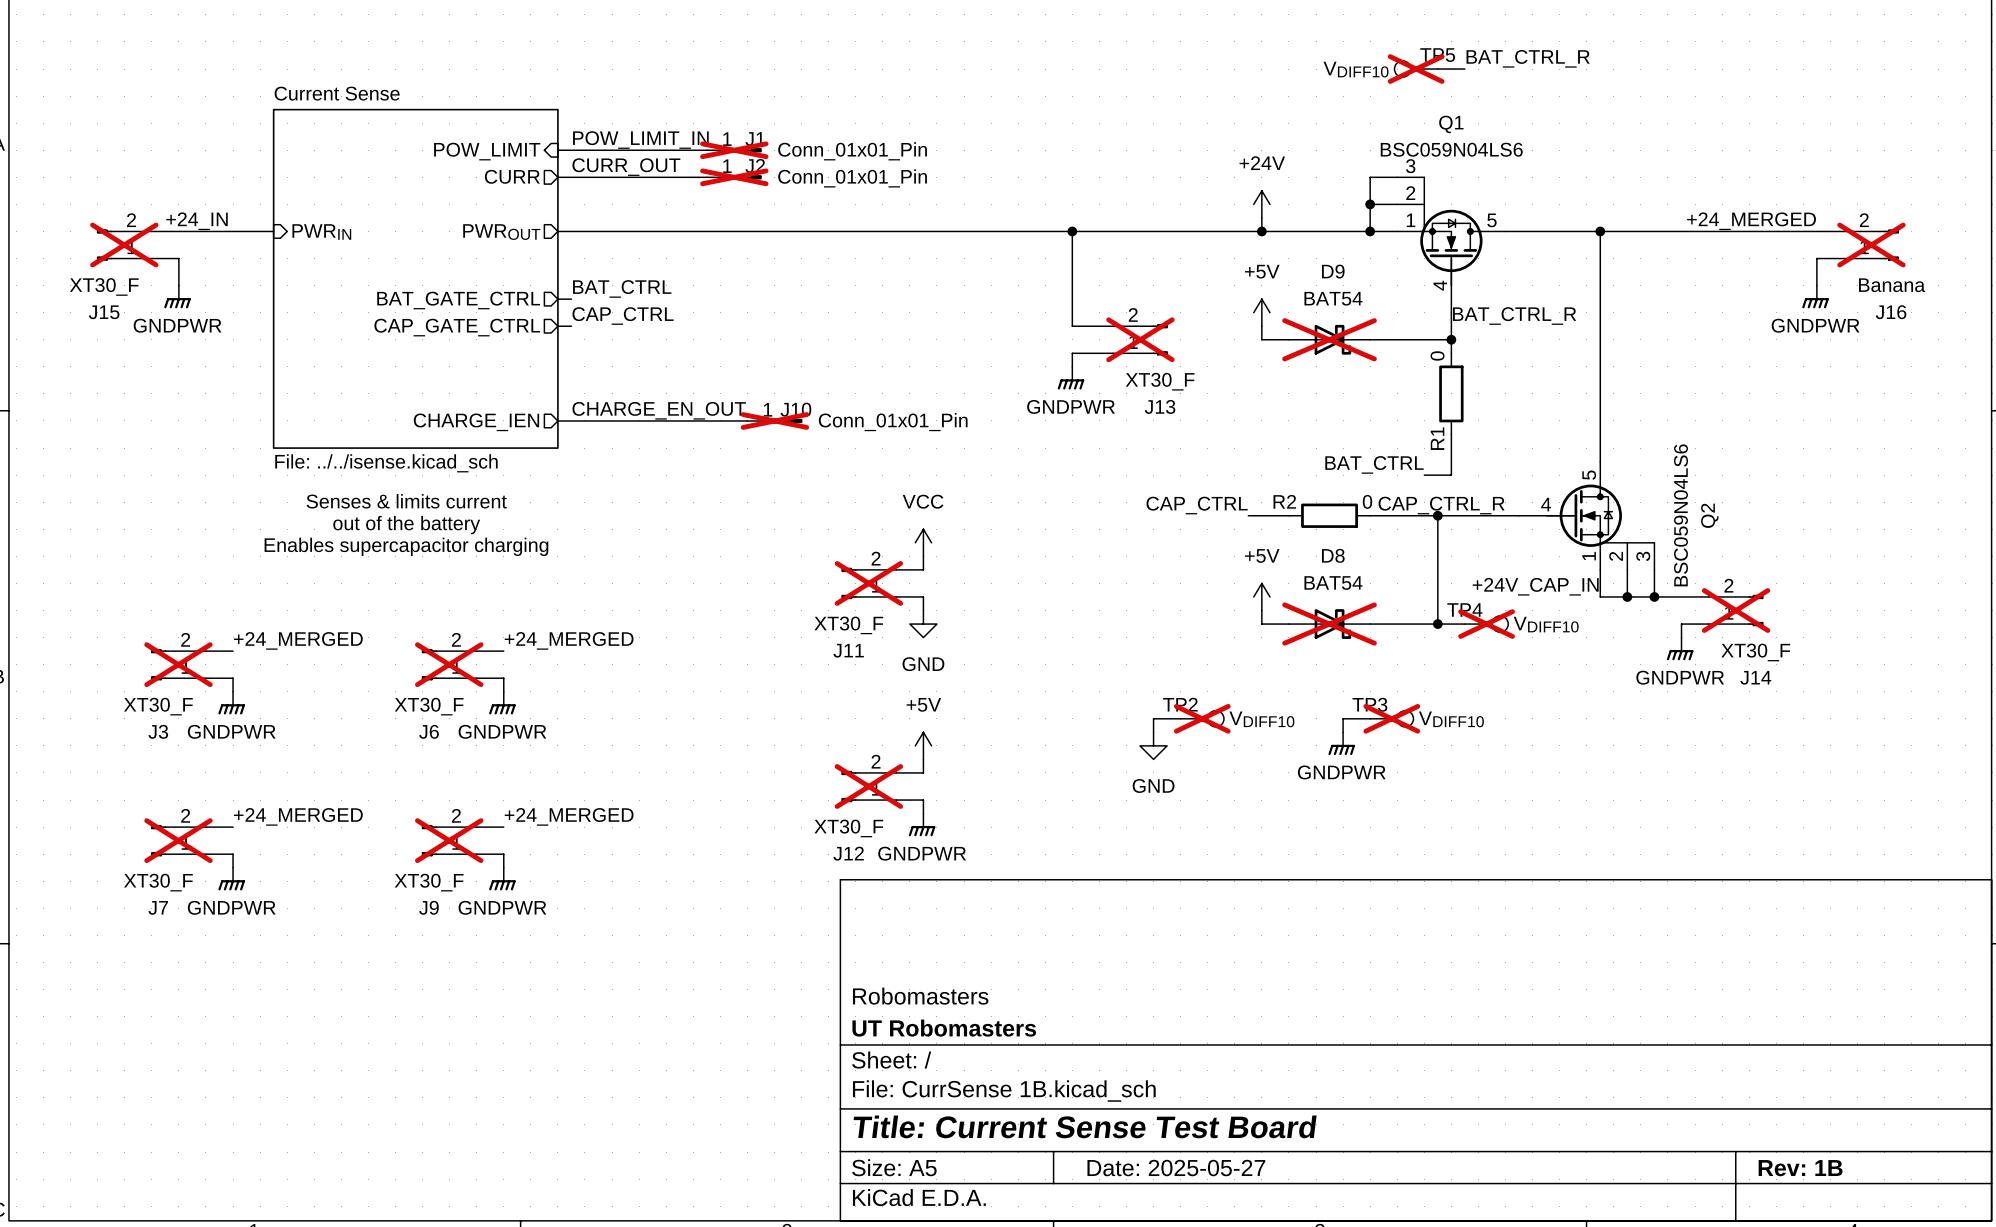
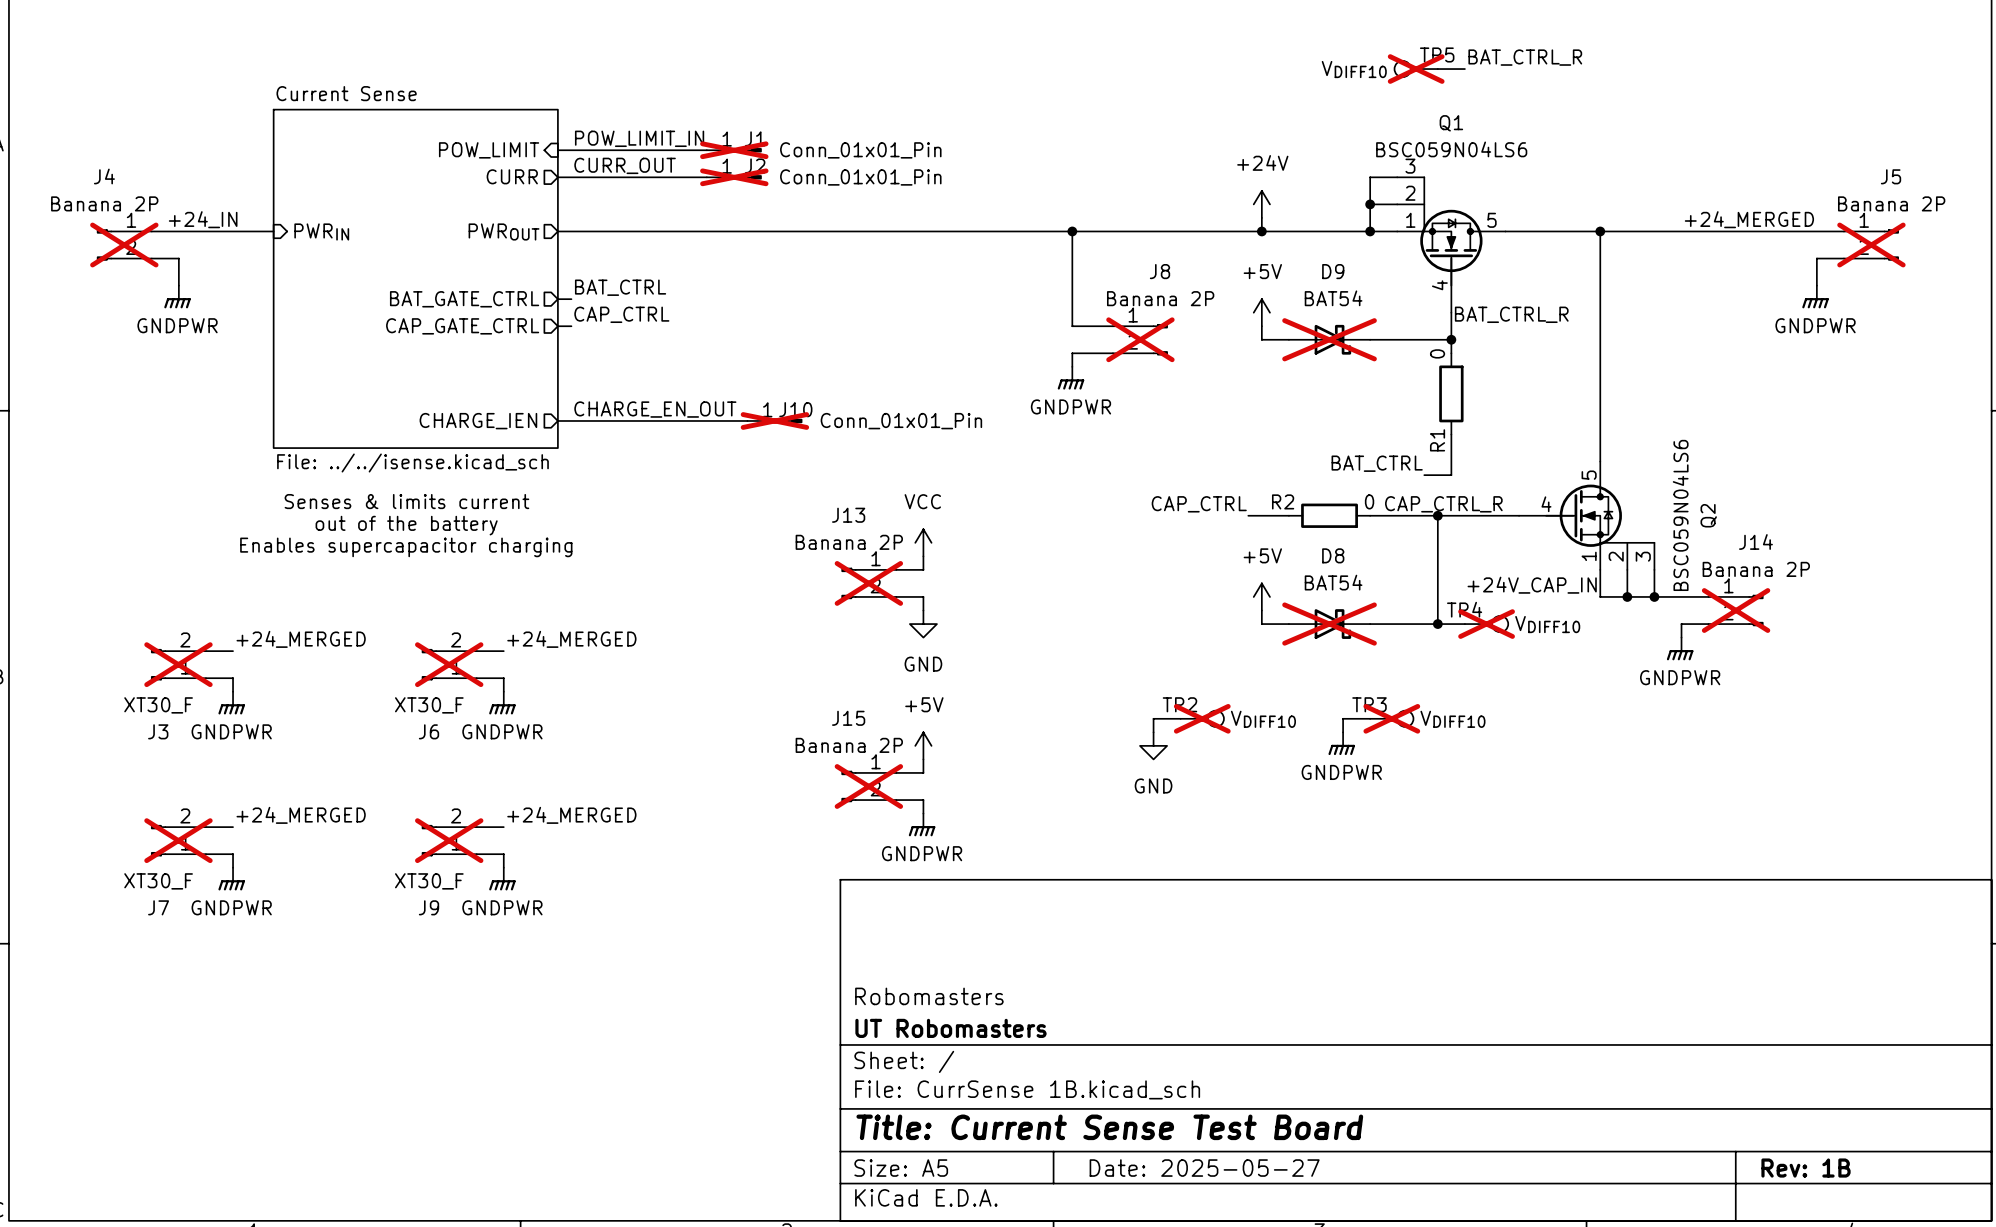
J15 flip: as is (104, 245) -> up-down (848, 786)
J15 position: (124, 245) -> (868, 786)
J4: none -> Banana 2P (124, 245)
J16 flip: as is (1891, 245) -> up-down (1891, 245)
J16 value: Banana (1892, 285) -> Banana 2P (1891, 203)
J15 value: XT30_F (104, 286) -> Banana 2P (849, 745)
J16 name: J16 (1891, 312) -> J5 (1891, 176)
J13 position: (1140, 339) -> (868, 583)
J8: none -> Banana 2P (1140, 339)
J13 rotation: 0° (1160, 339) -> 180° (848, 583)
J13 value: XT30_F (1160, 381) -> Banana 2P (849, 542)
J11: XT30_F (868, 583) -> none
J14 flip: as is (1755, 610) -> up-down (1755, 610)
J14 value: XT30_F (1755, 652) -> Banana 2P (1756, 569)
J12: XT30_F (868, 786) -> none

